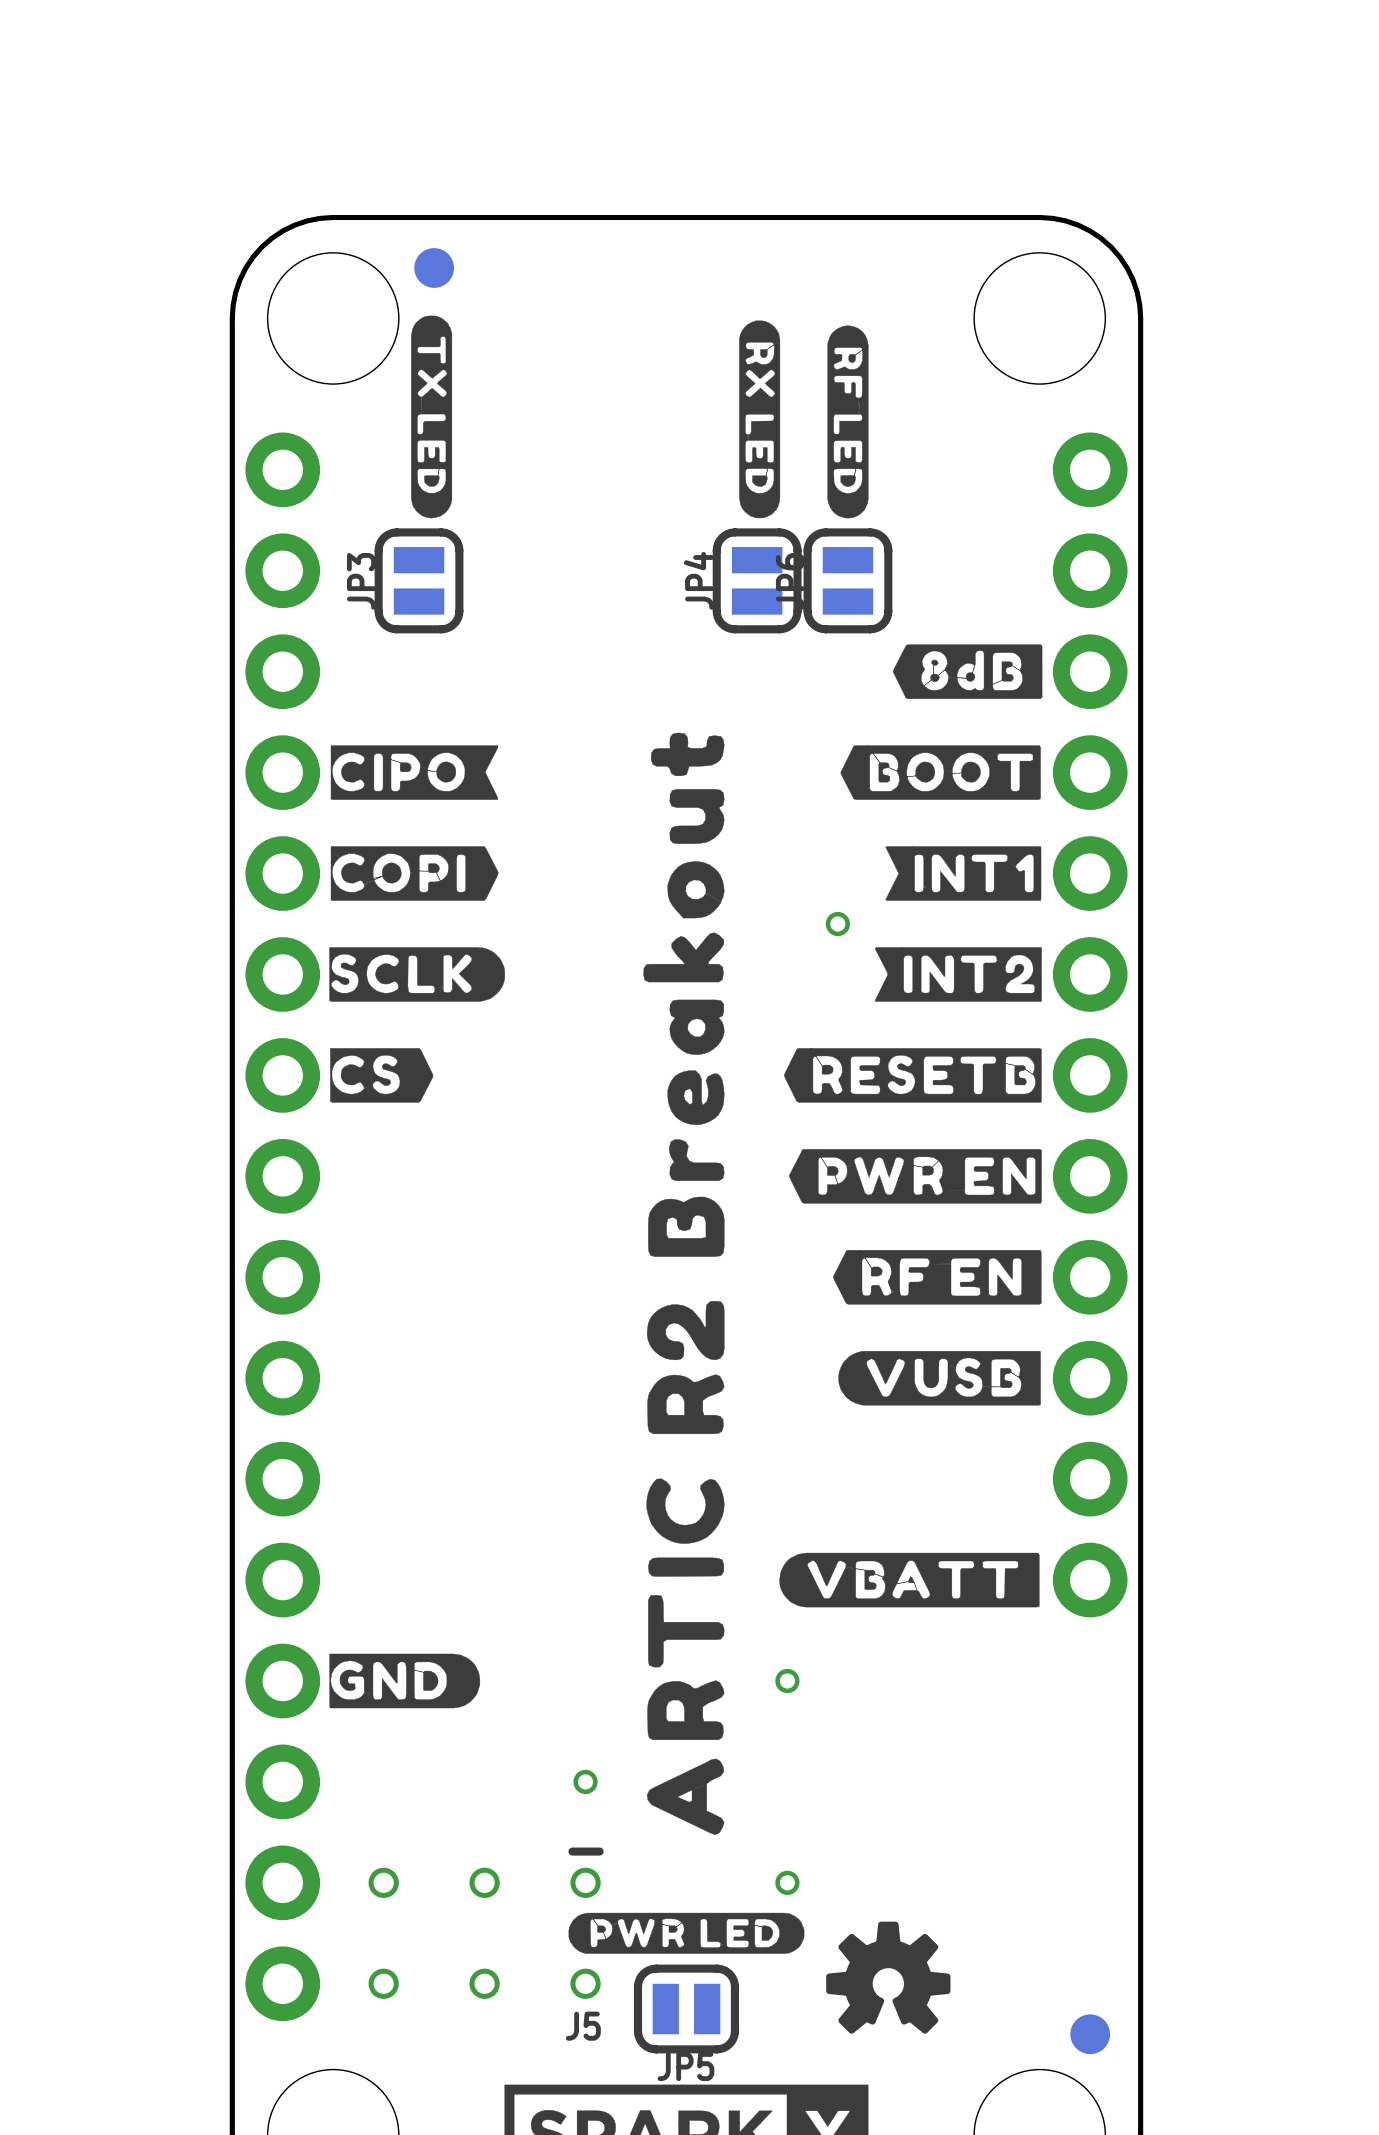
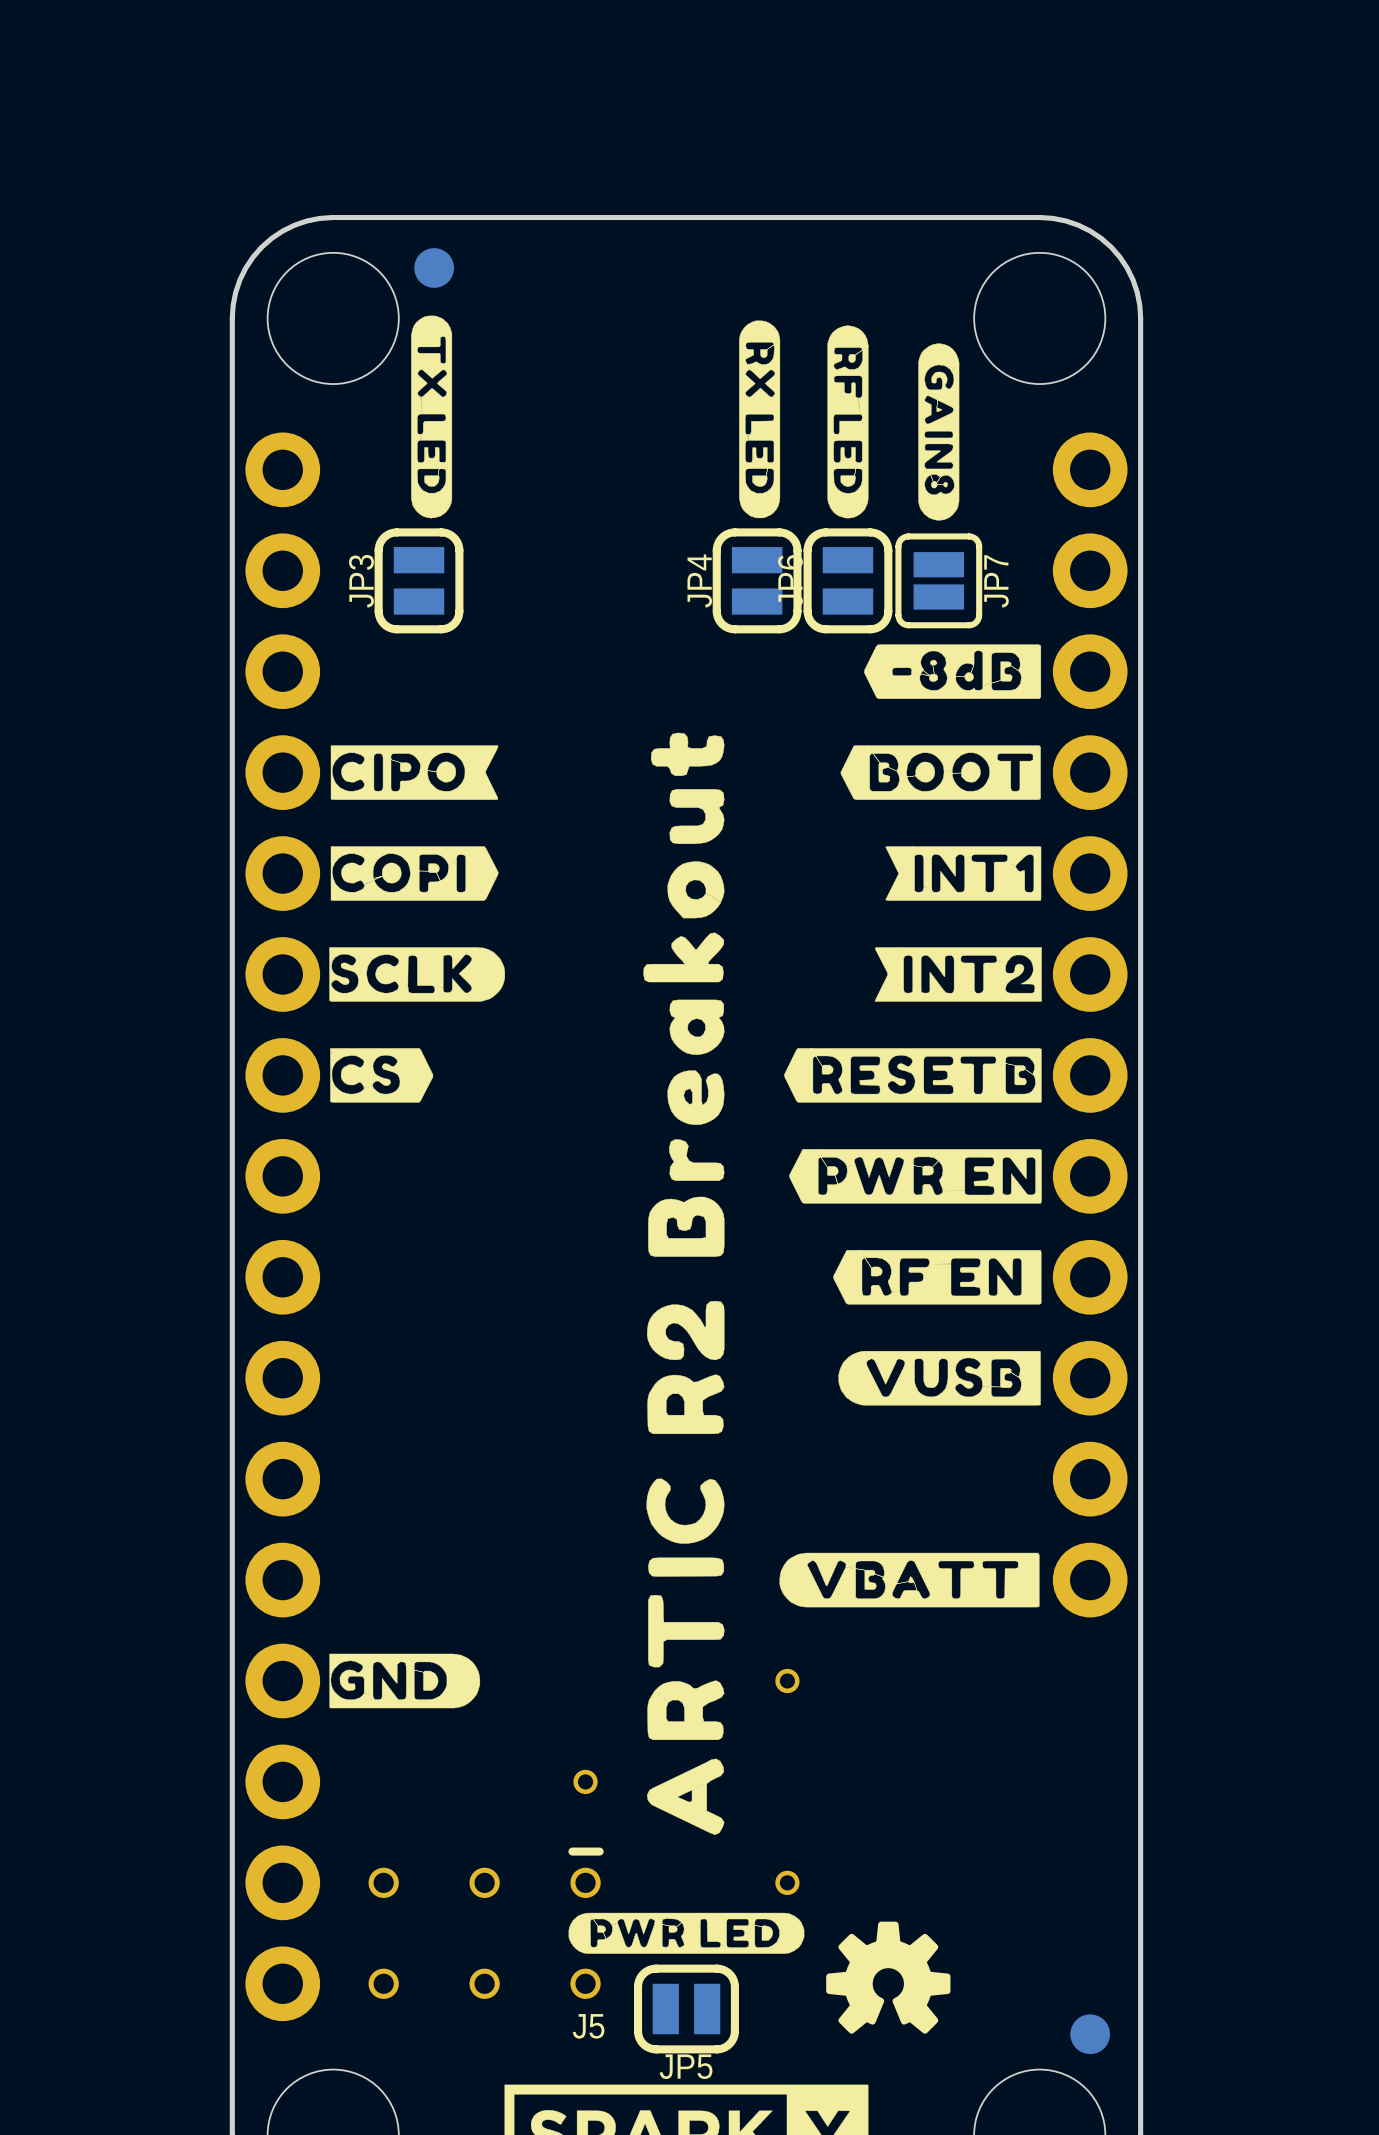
drawing: none -> [918, 343, 960, 521]
JP7: none -> (938, 580)
drawing shape: [892, 644, 1043, 699] -> [864, 644, 1042, 699]
part: (837, 924) -> none

